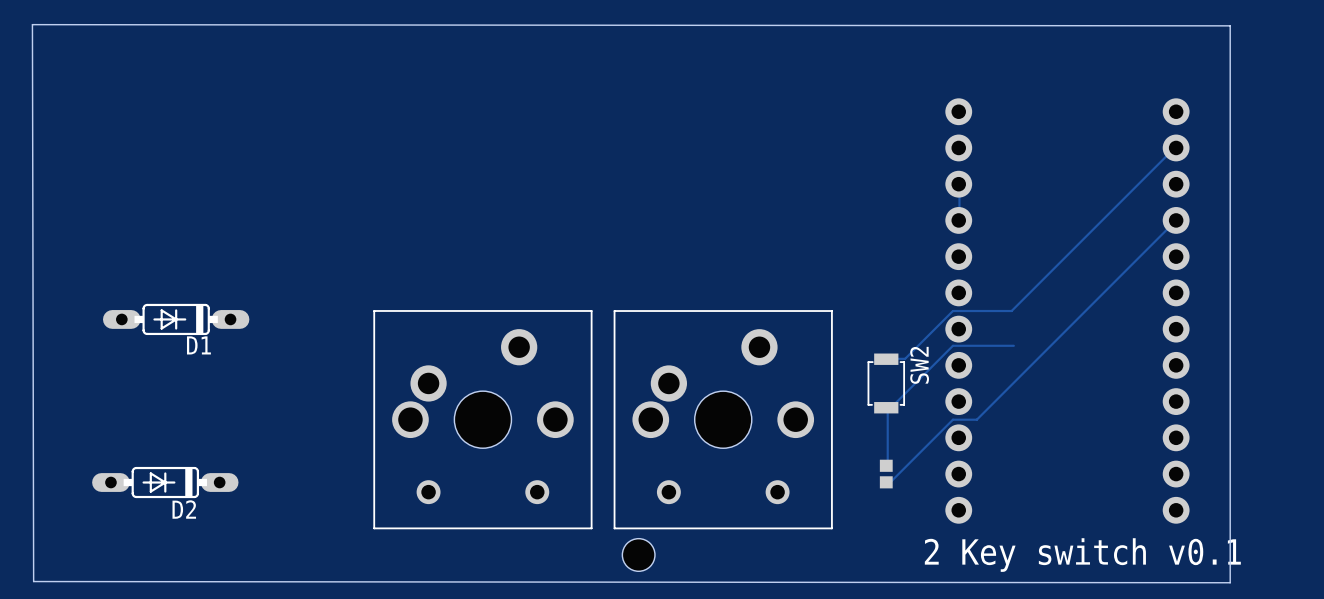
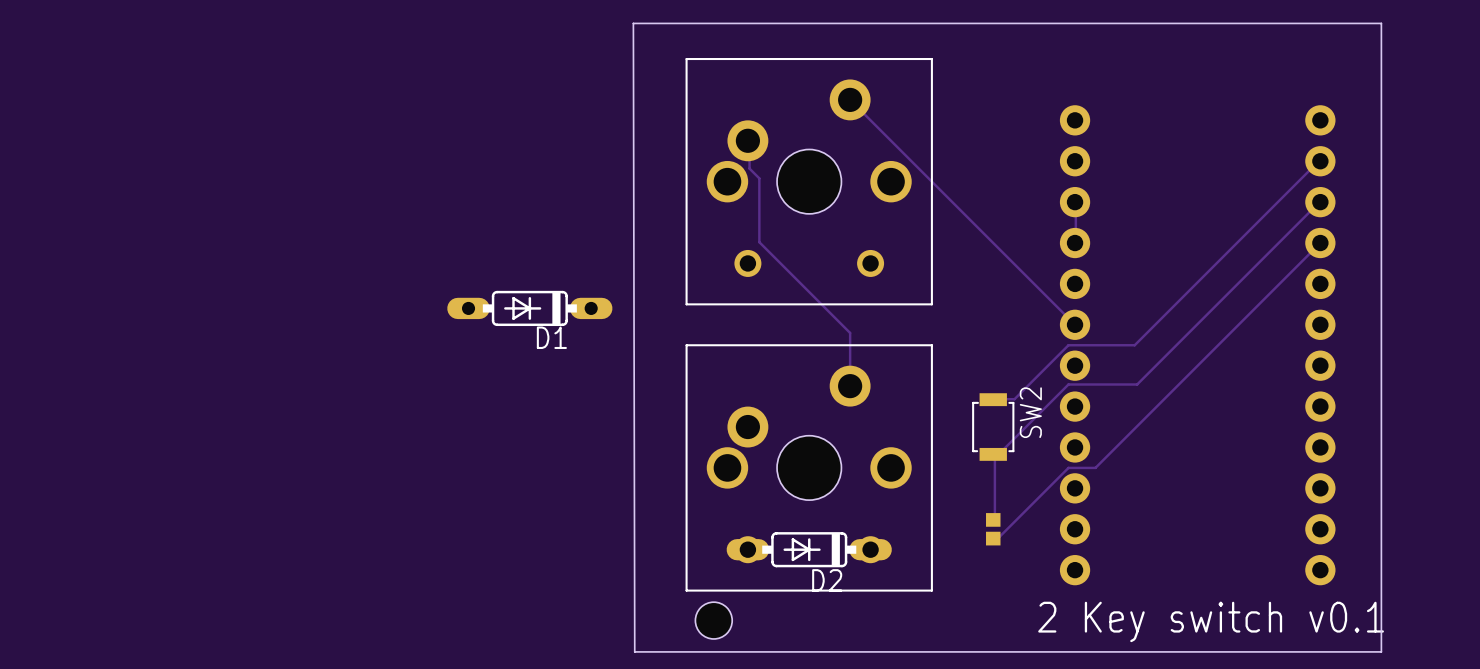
board edge: (1230, 25) (32, 24) (33, 581) (1230, 582) -> (1381, 23) (633, 23) (634, 651) (1381, 651)
track: none -> (850, 99) (1075, 324)
track: none -> (747, 140) (749, 141) (749, 168) (759, 178) (759, 242) (850, 332) (850, 386)
track: none -> (1318, 202) (1137, 384)
D1 position: (176, 319) -> (529, 308)
part position: (482, 419) -> (809, 181)
D2 position: (165, 482) -> (809, 549)

